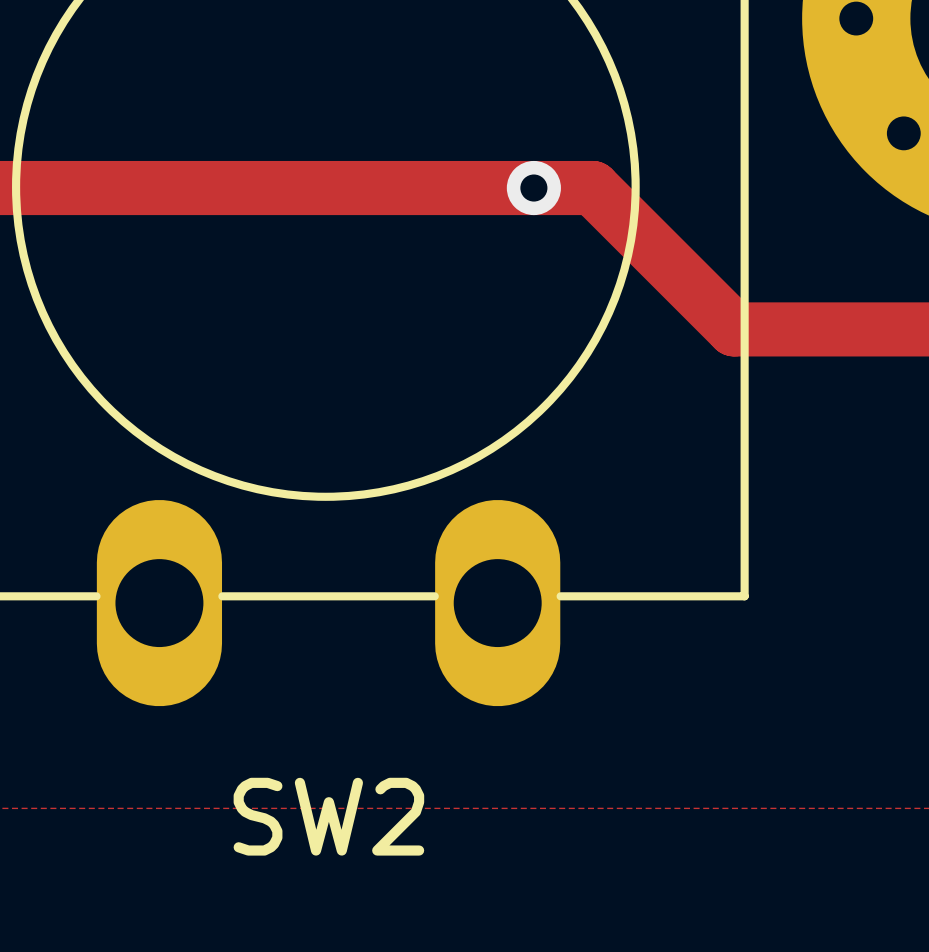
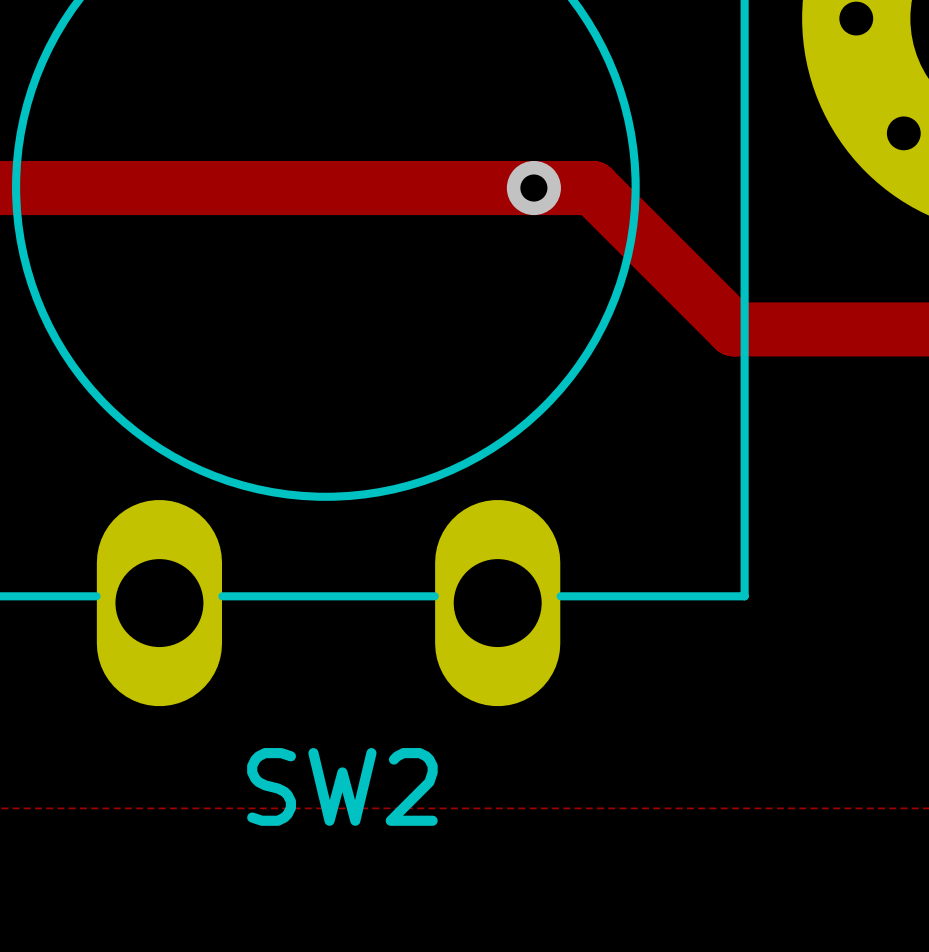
SW2 name position: SW2 (328, 816) -> SW2 (342, 786)

